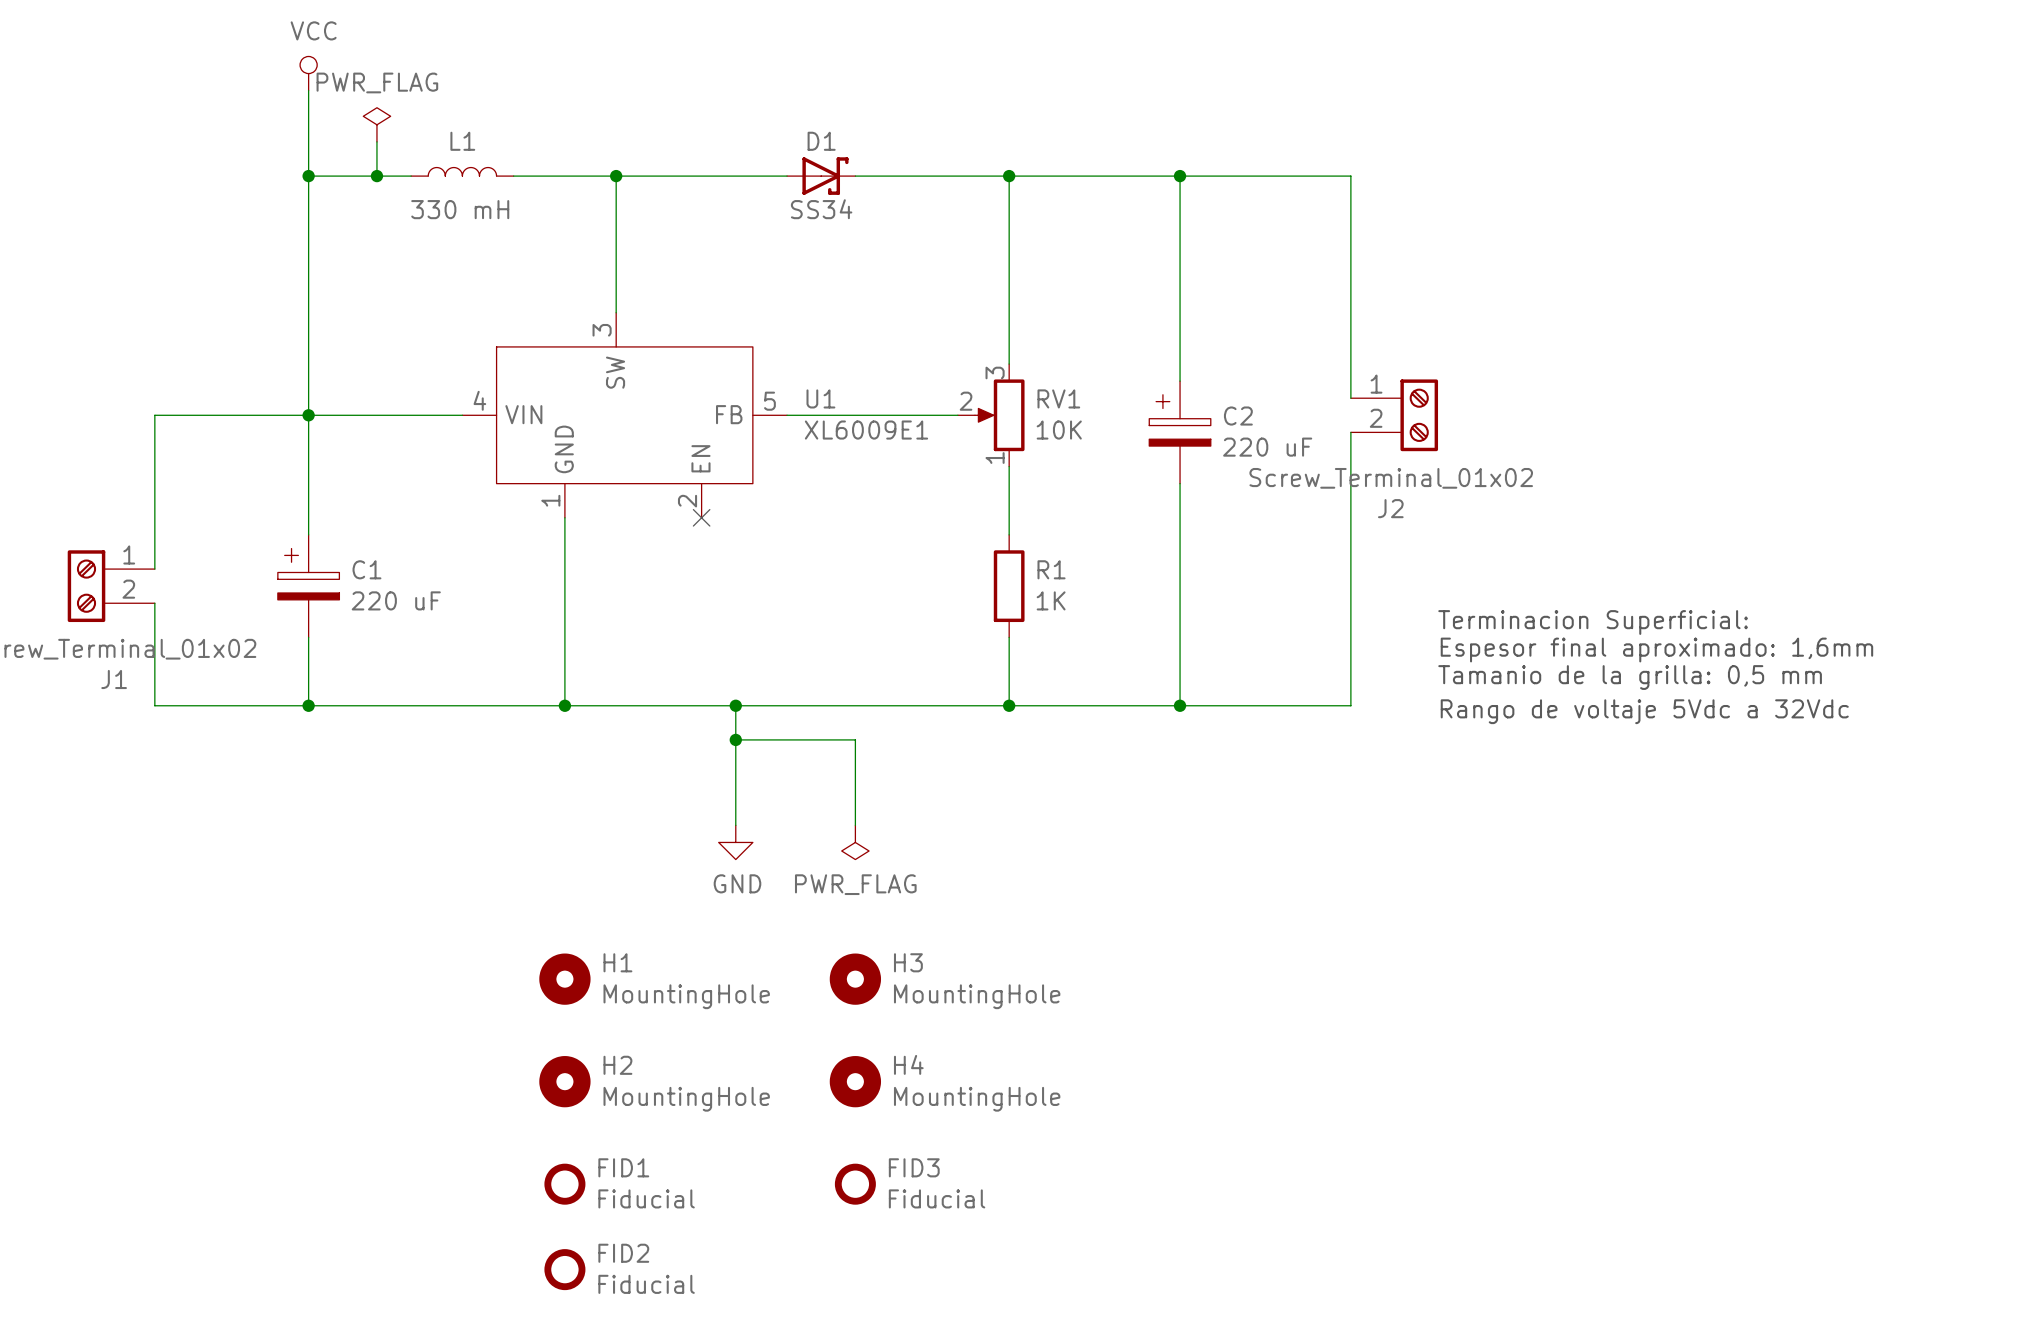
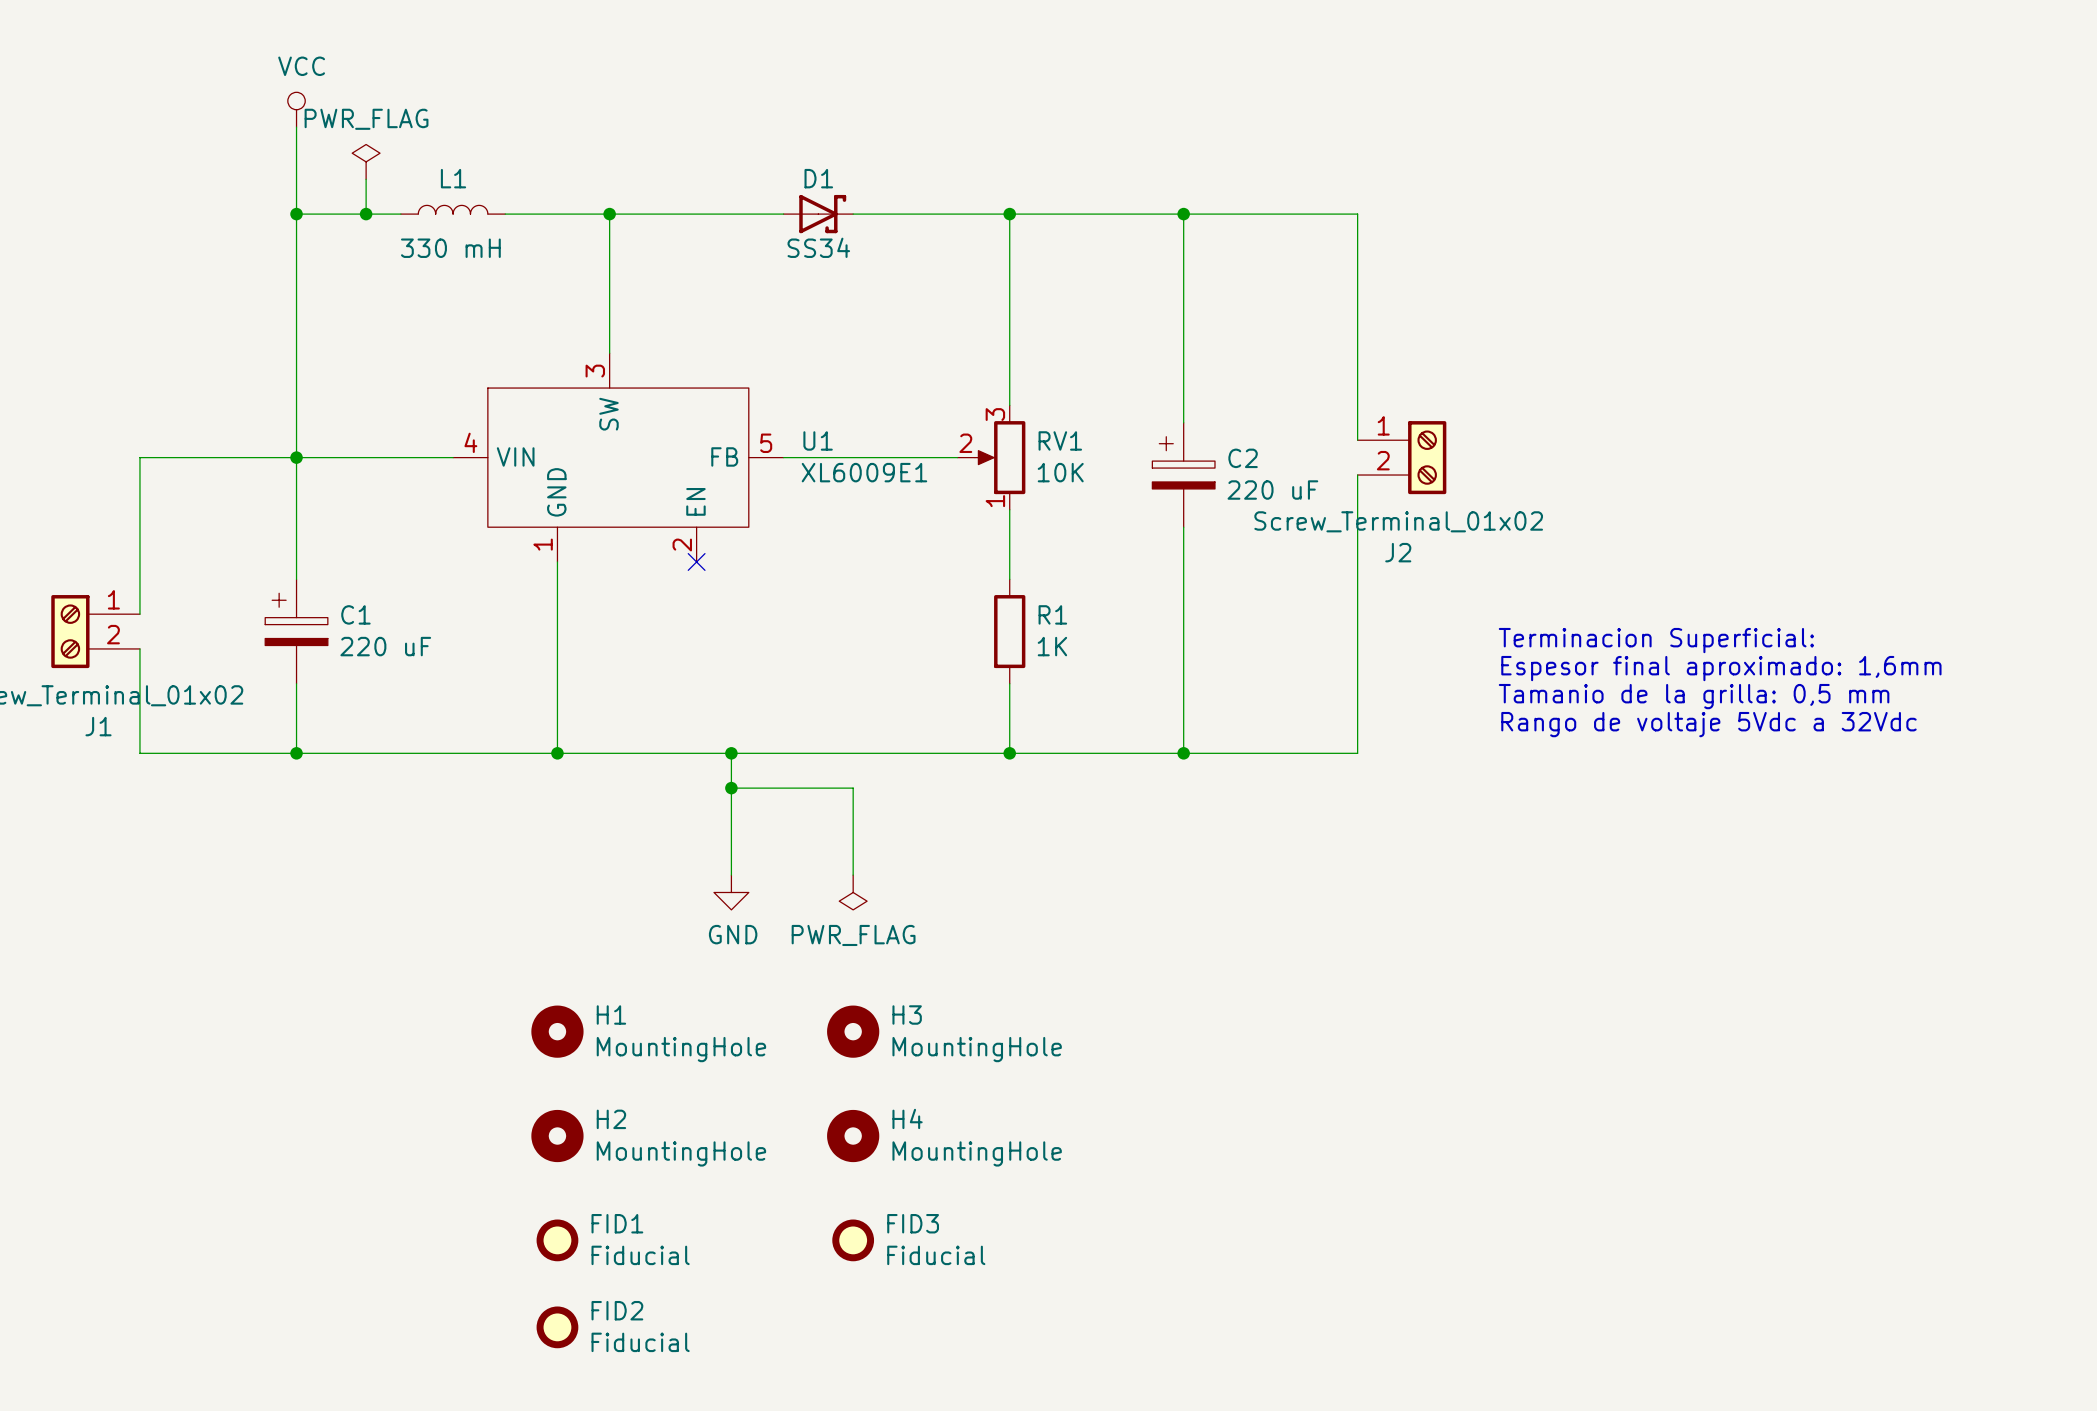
text position: Terminacion Superficial: (1593, 622) -> Terminacion Superficial: (1656, 640)
text position: Espesor final aproximado: 1,6mm (1656, 650) -> Espesor final aproximado: 1,6mm (1721, 668)
text position: Tamanio de la grilla: 0,5 mm (1630, 677) -> Tamanio de la grilla: 0,5 mm (1694, 696)
text position: Rango de voltaje 5Vdc a 32Vdc (1644, 711) -> Rango de voltaje 5Vdc a 32Vdc (1708, 724)

